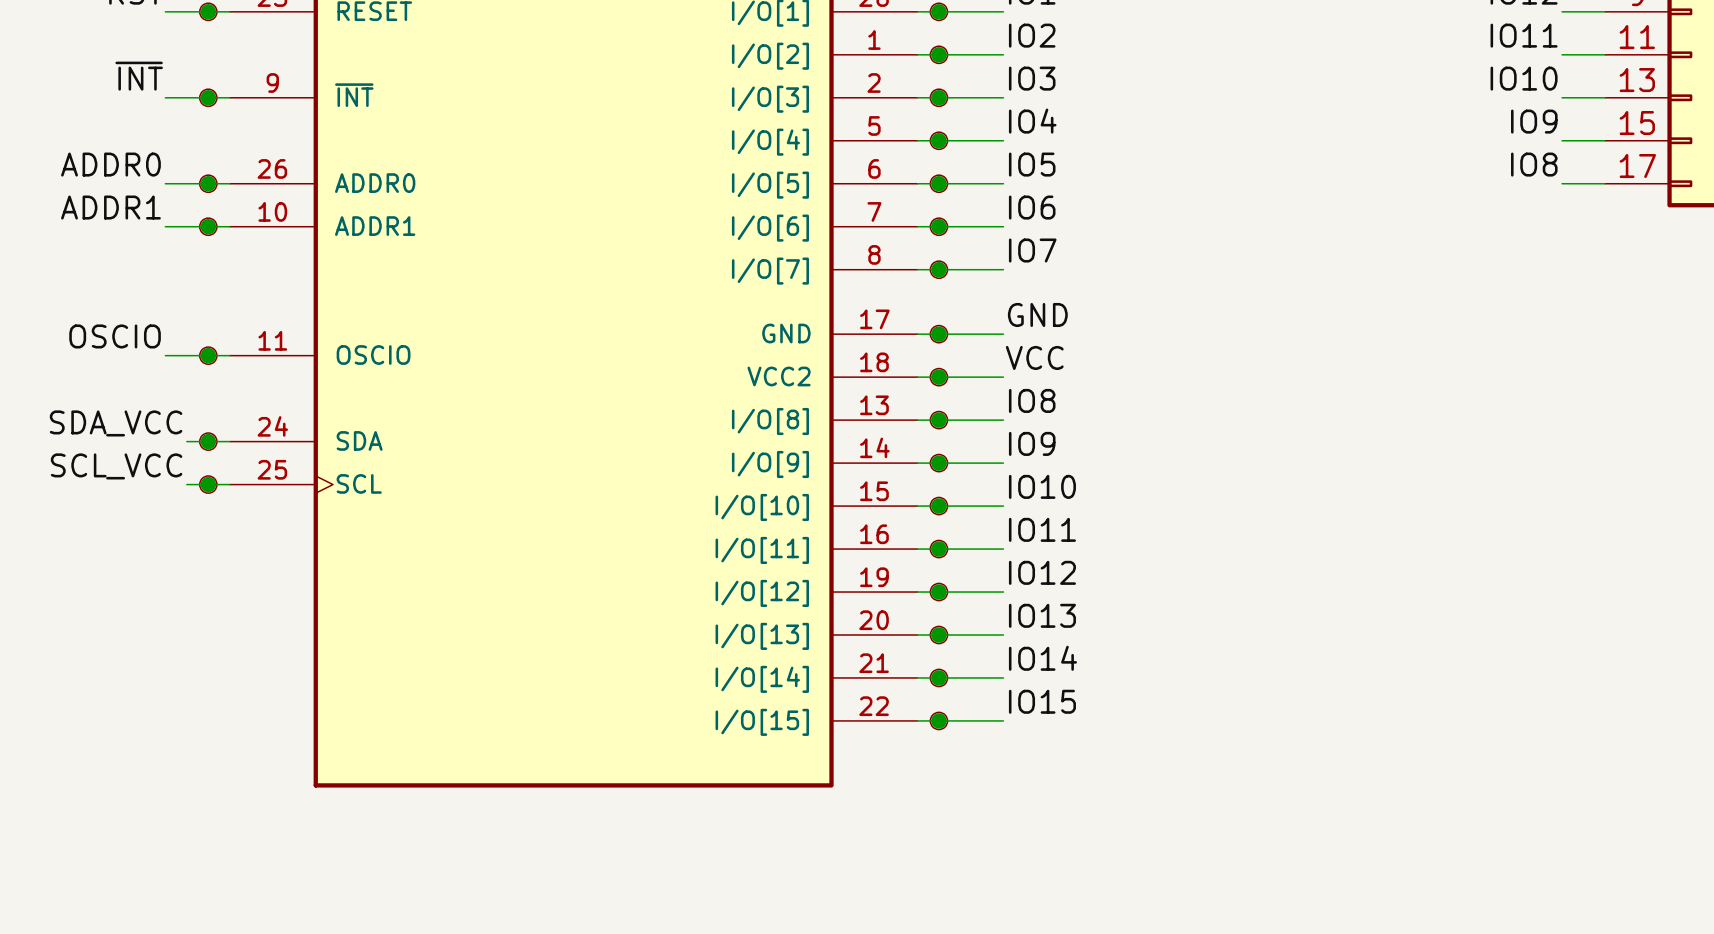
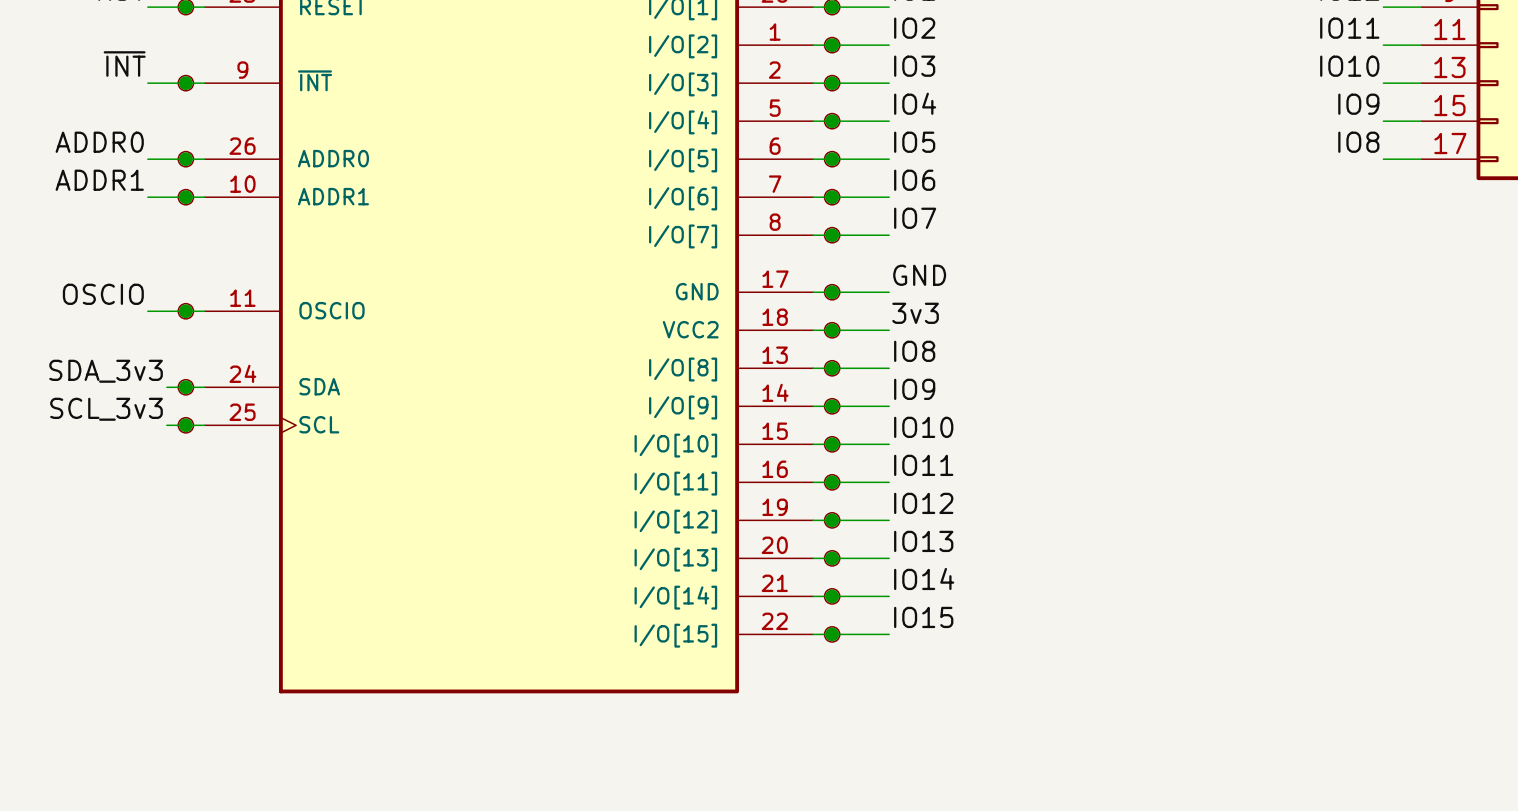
label: VCC (1034, 357) -> 3v3 (915, 313)
label: SDA_VCC (116, 423) -> SDA_3v3 (106, 371)
label: SCL_VCC (116, 466) -> SCL_3v3 (106, 409)

